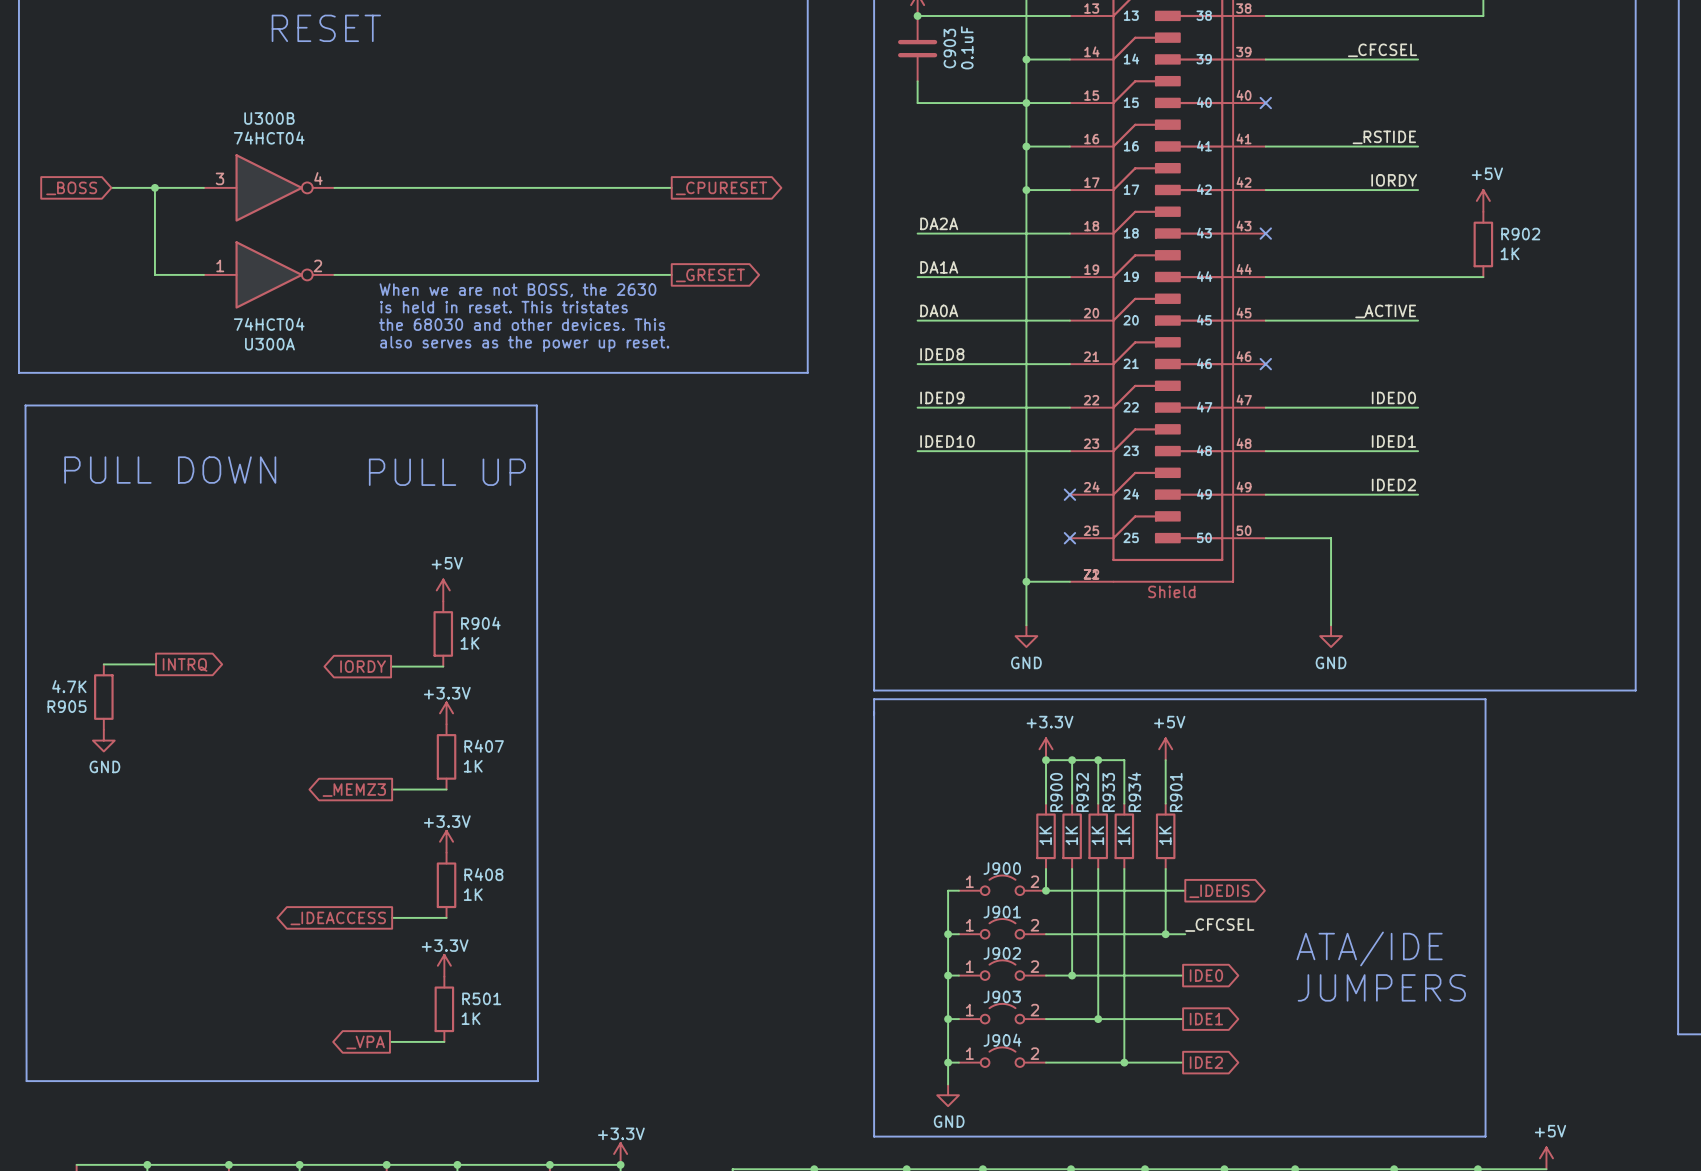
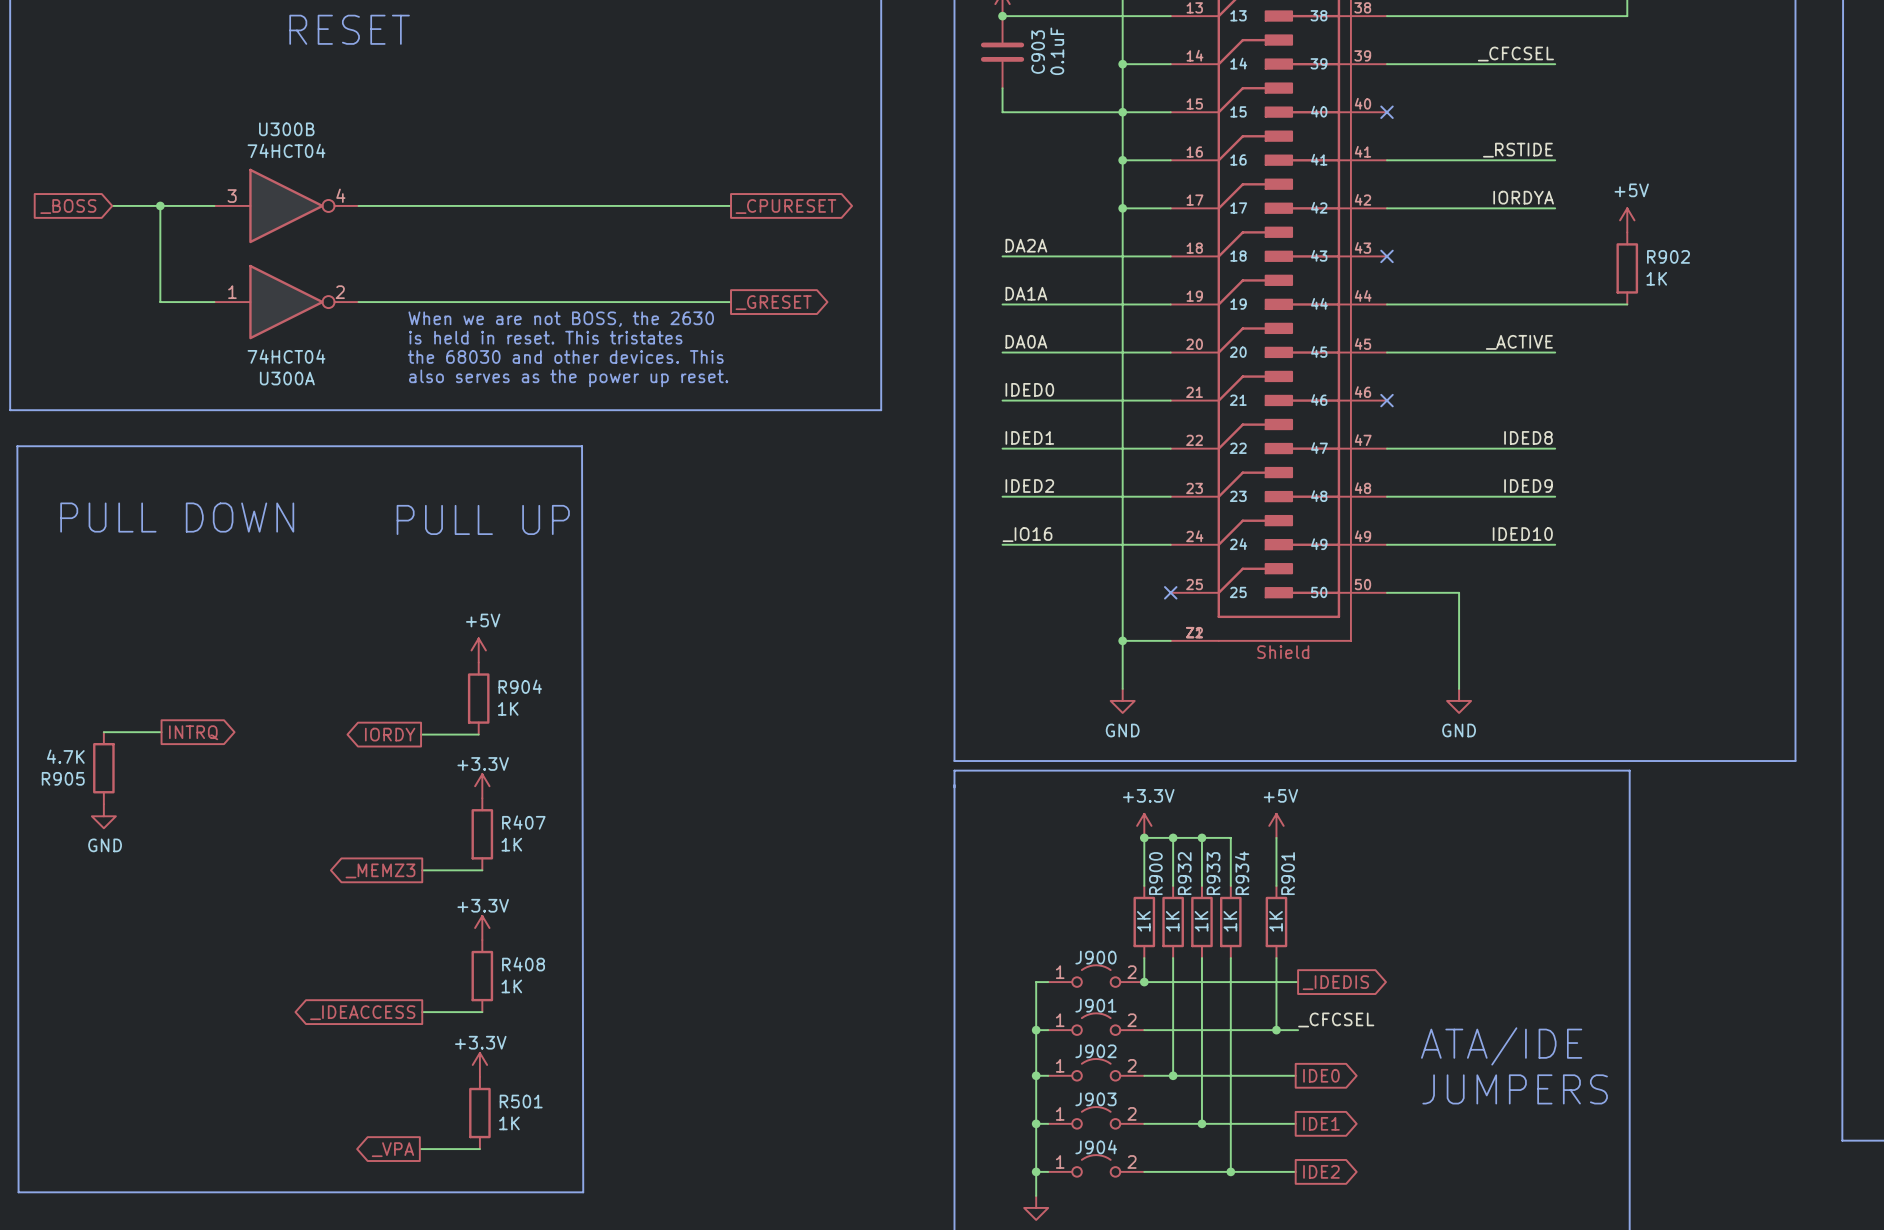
label: IORDY (1394, 180) -> IORDYA (1523, 197)
label: IDED8 (942, 354) -> IDED0 (1029, 389)
label: IDED9 (942, 397) -> IDED1 (1029, 437)
label: IDED0 (1393, 397) -> IDED8 (1528, 437)
label: IDED10 (947, 441) -> IDED2 (1029, 485)
label: IDED1 (1393, 441) -> IDED9 (1528, 485)
label: IDED2 (1393, 484) -> IDED10 (1522, 534)
label: none -> _IO16 (1027, 534)
wire: none -> (1002, 544) (1170, 544)
no-connect mark: (1069, 494) -> none

